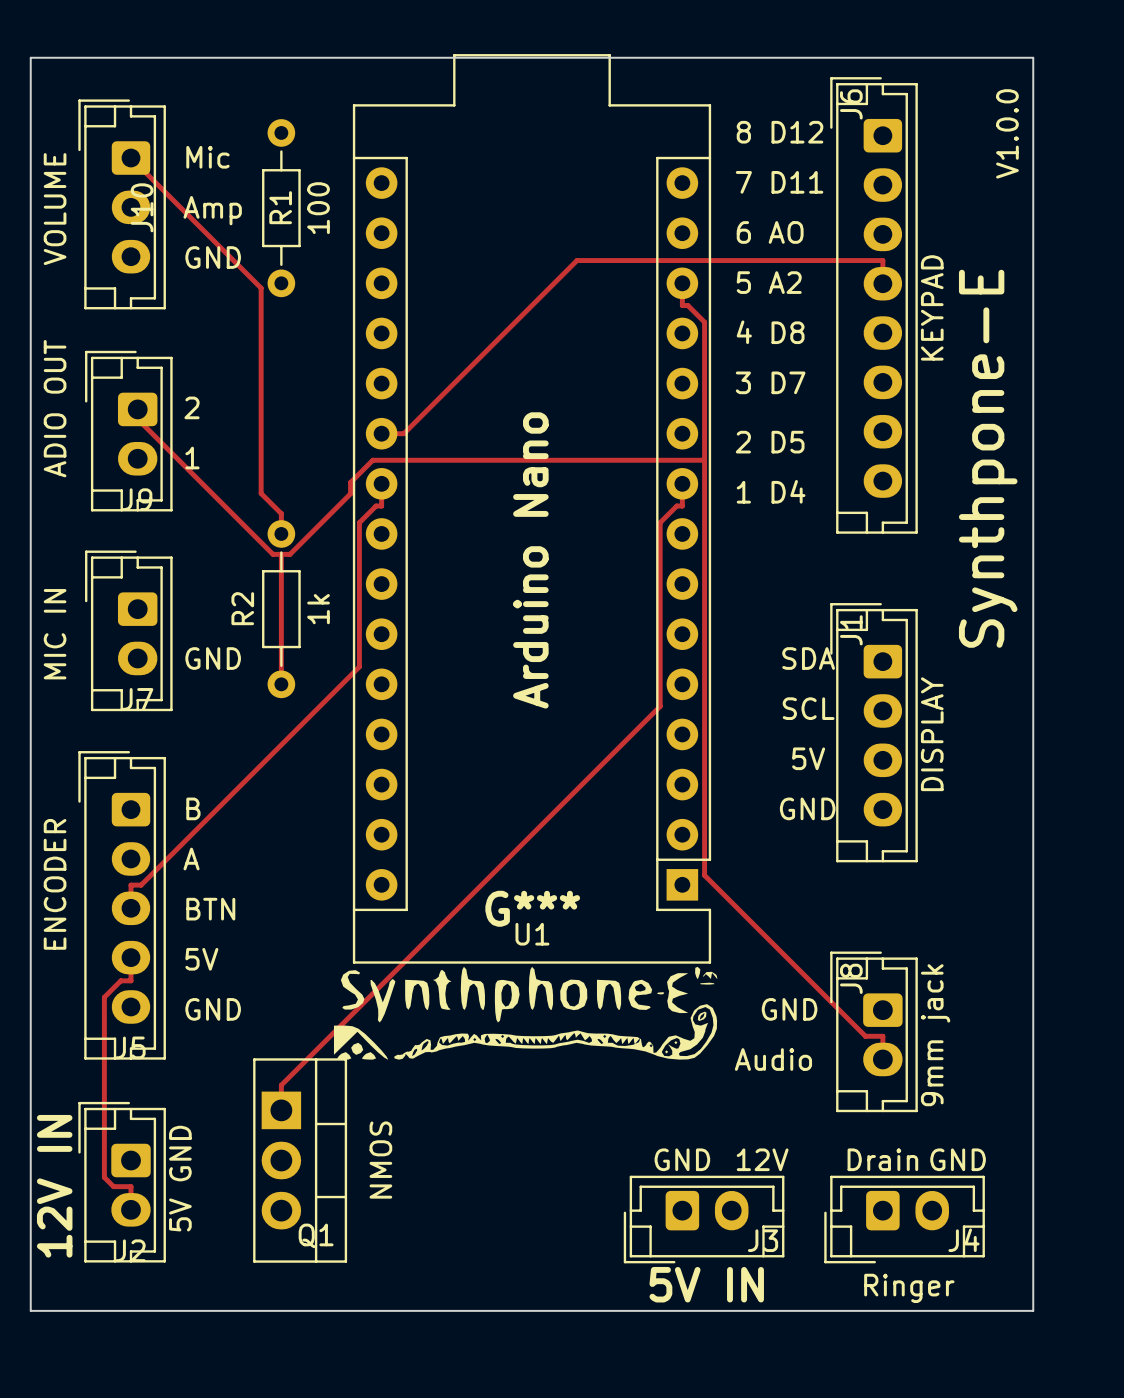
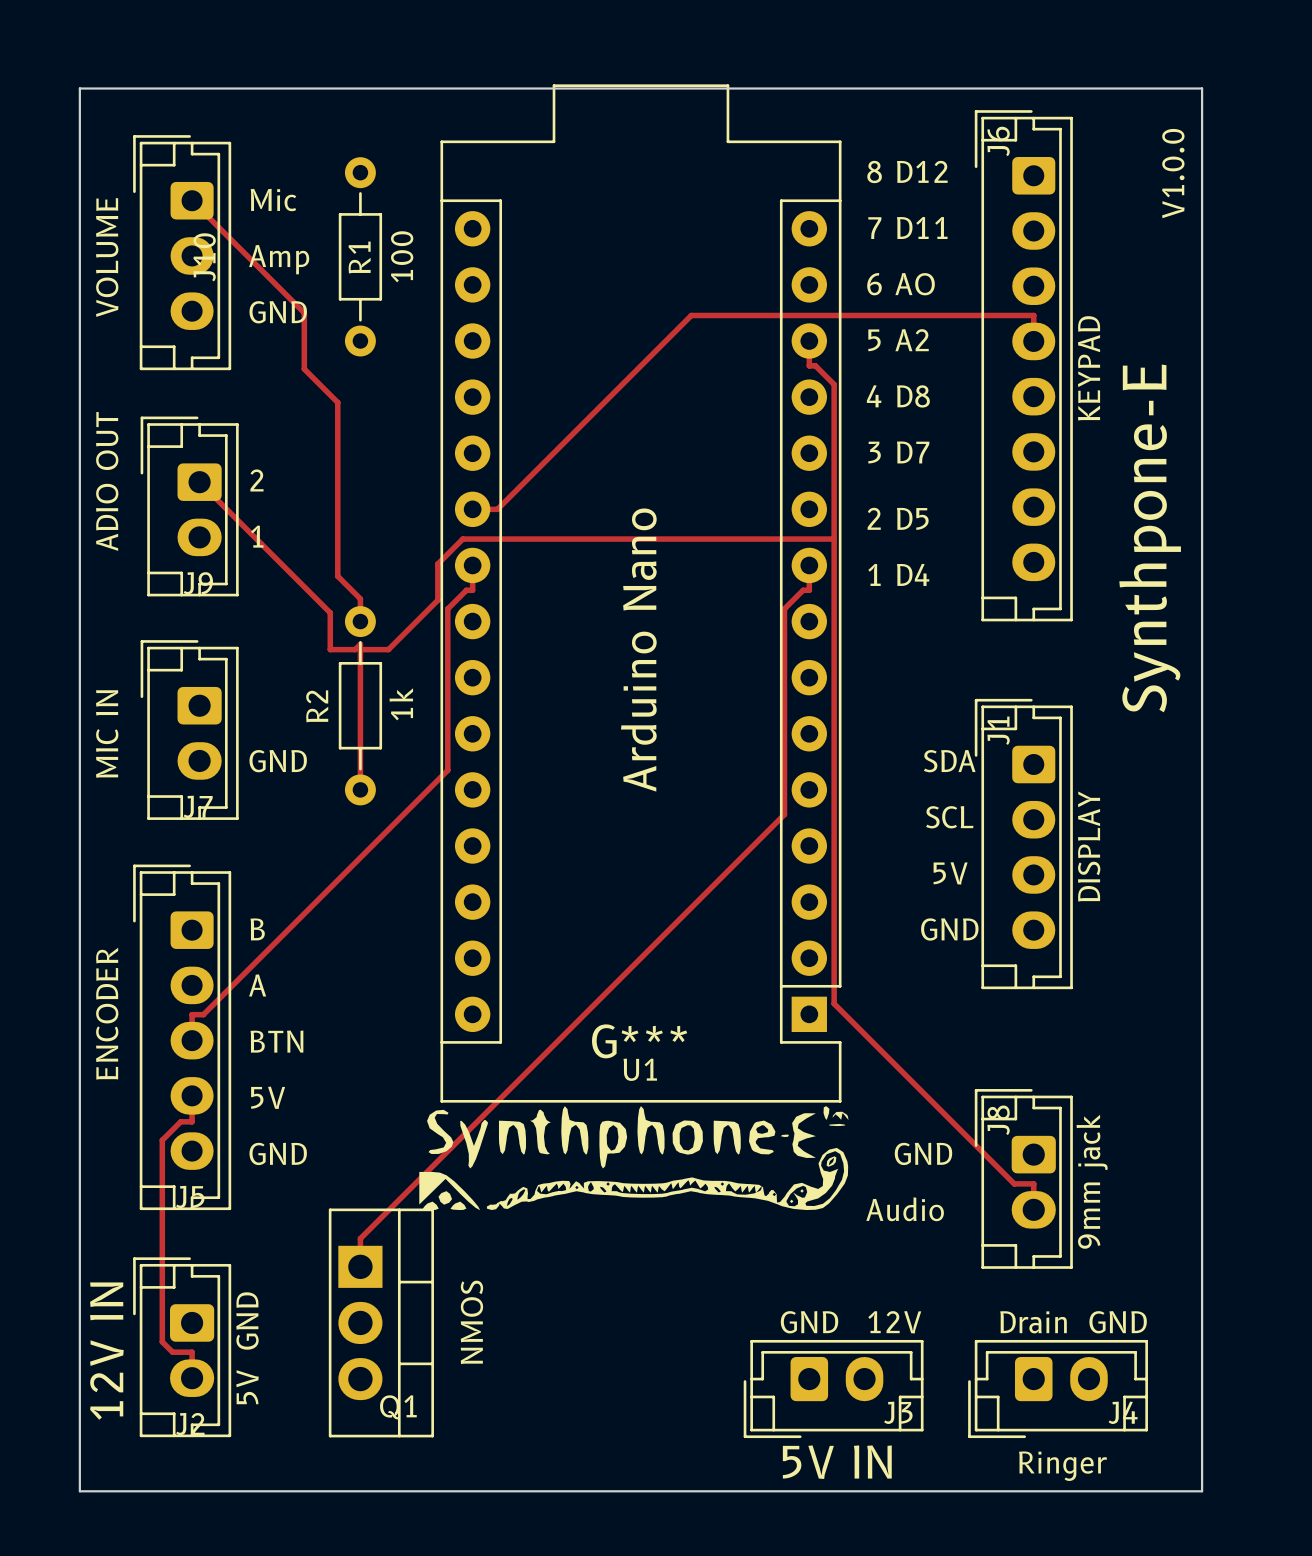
track: (231, 258) (261, 288) (261, 338) -> (304, 312) (304, 369) (337, 402)
track: (137, 409) (137, 419) (272, 554) (290, 554) (350, 493) -> (199, 482) (330, 612) (330, 649) (355, 649) (360, 644)
track: none -> (437, 576) (437, 600) (388, 649) (360, 649)

